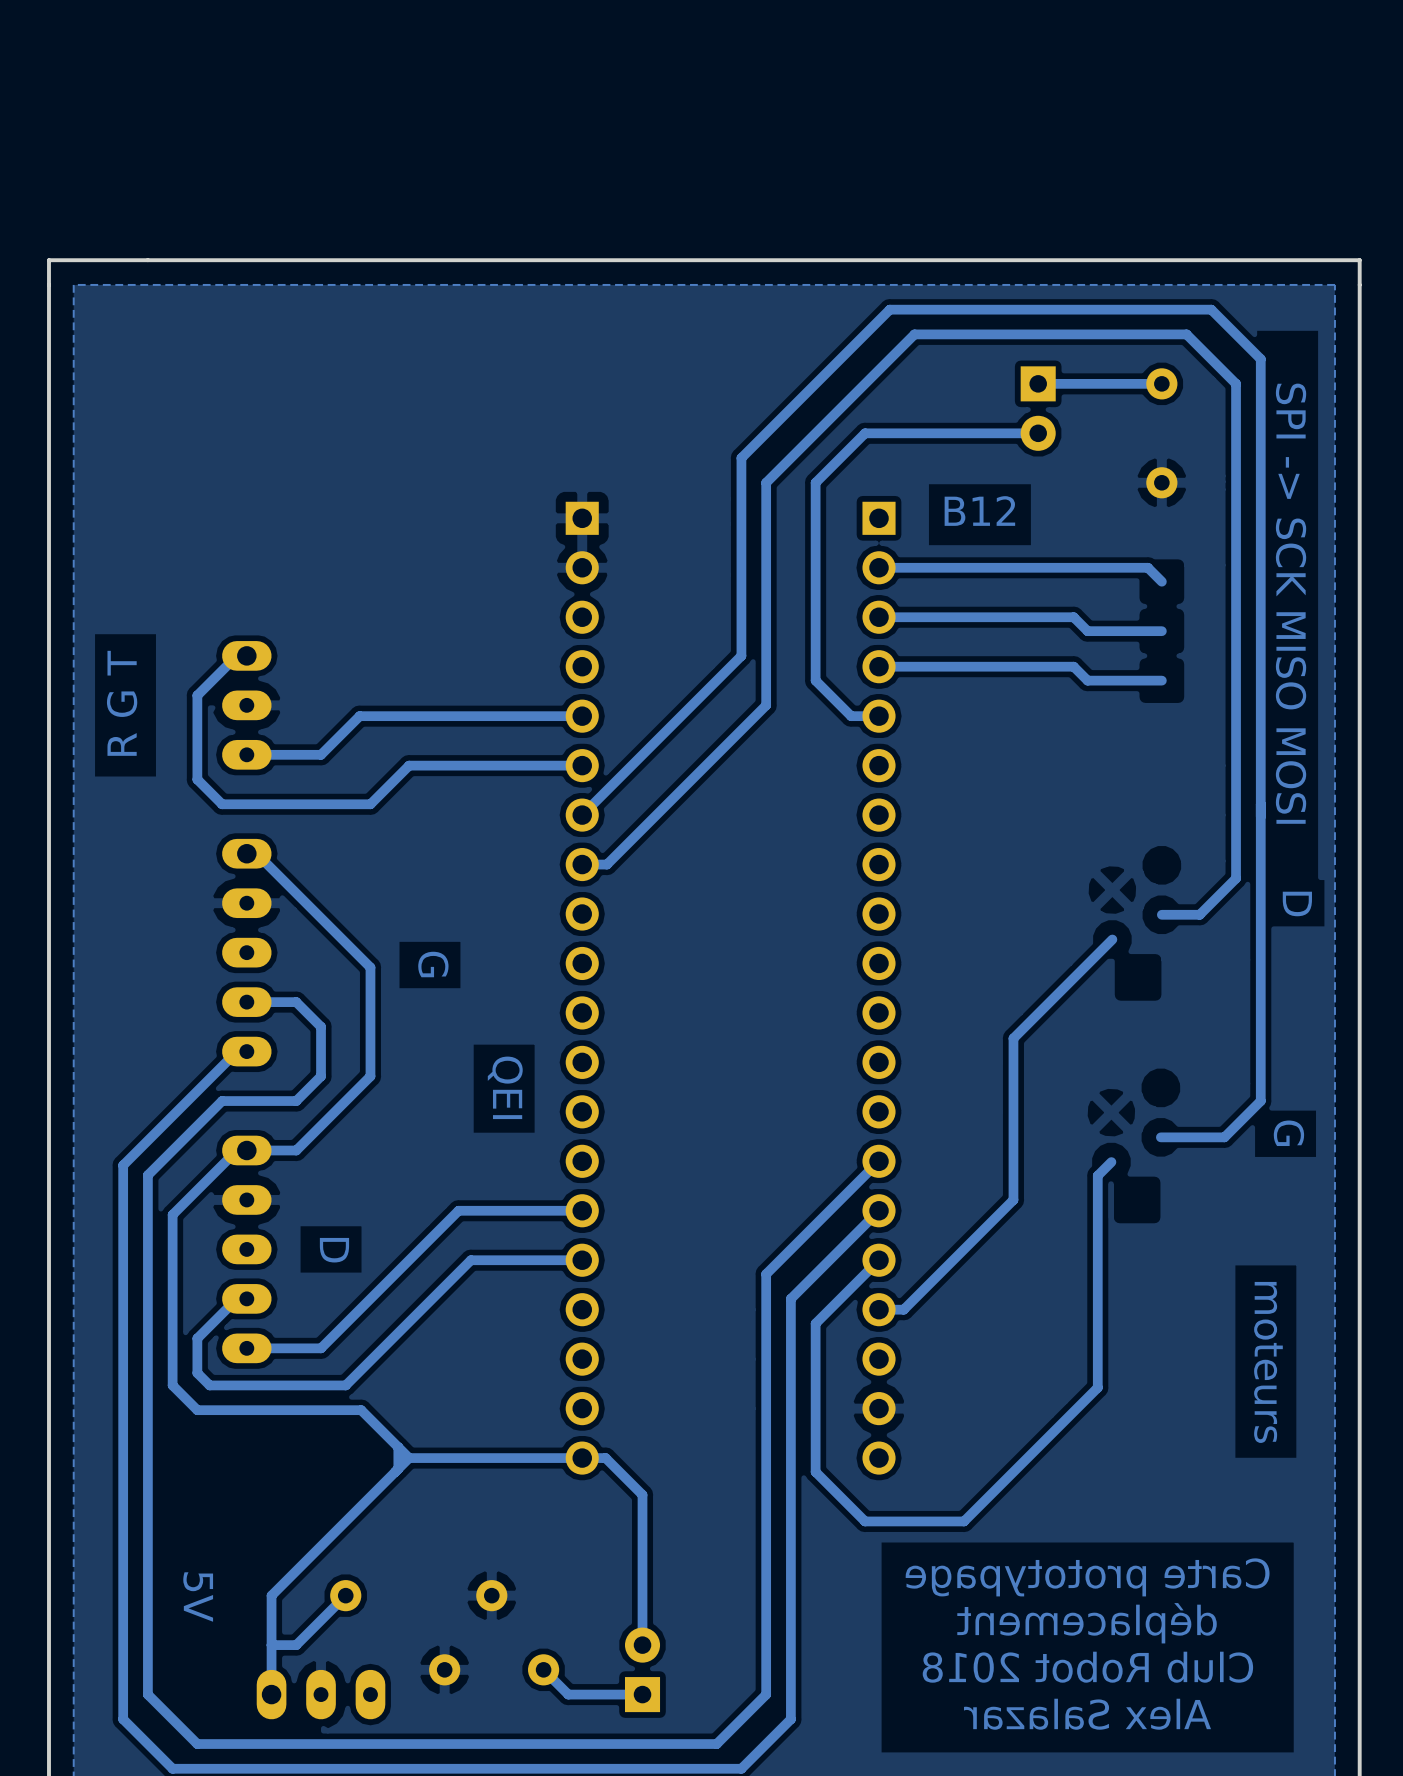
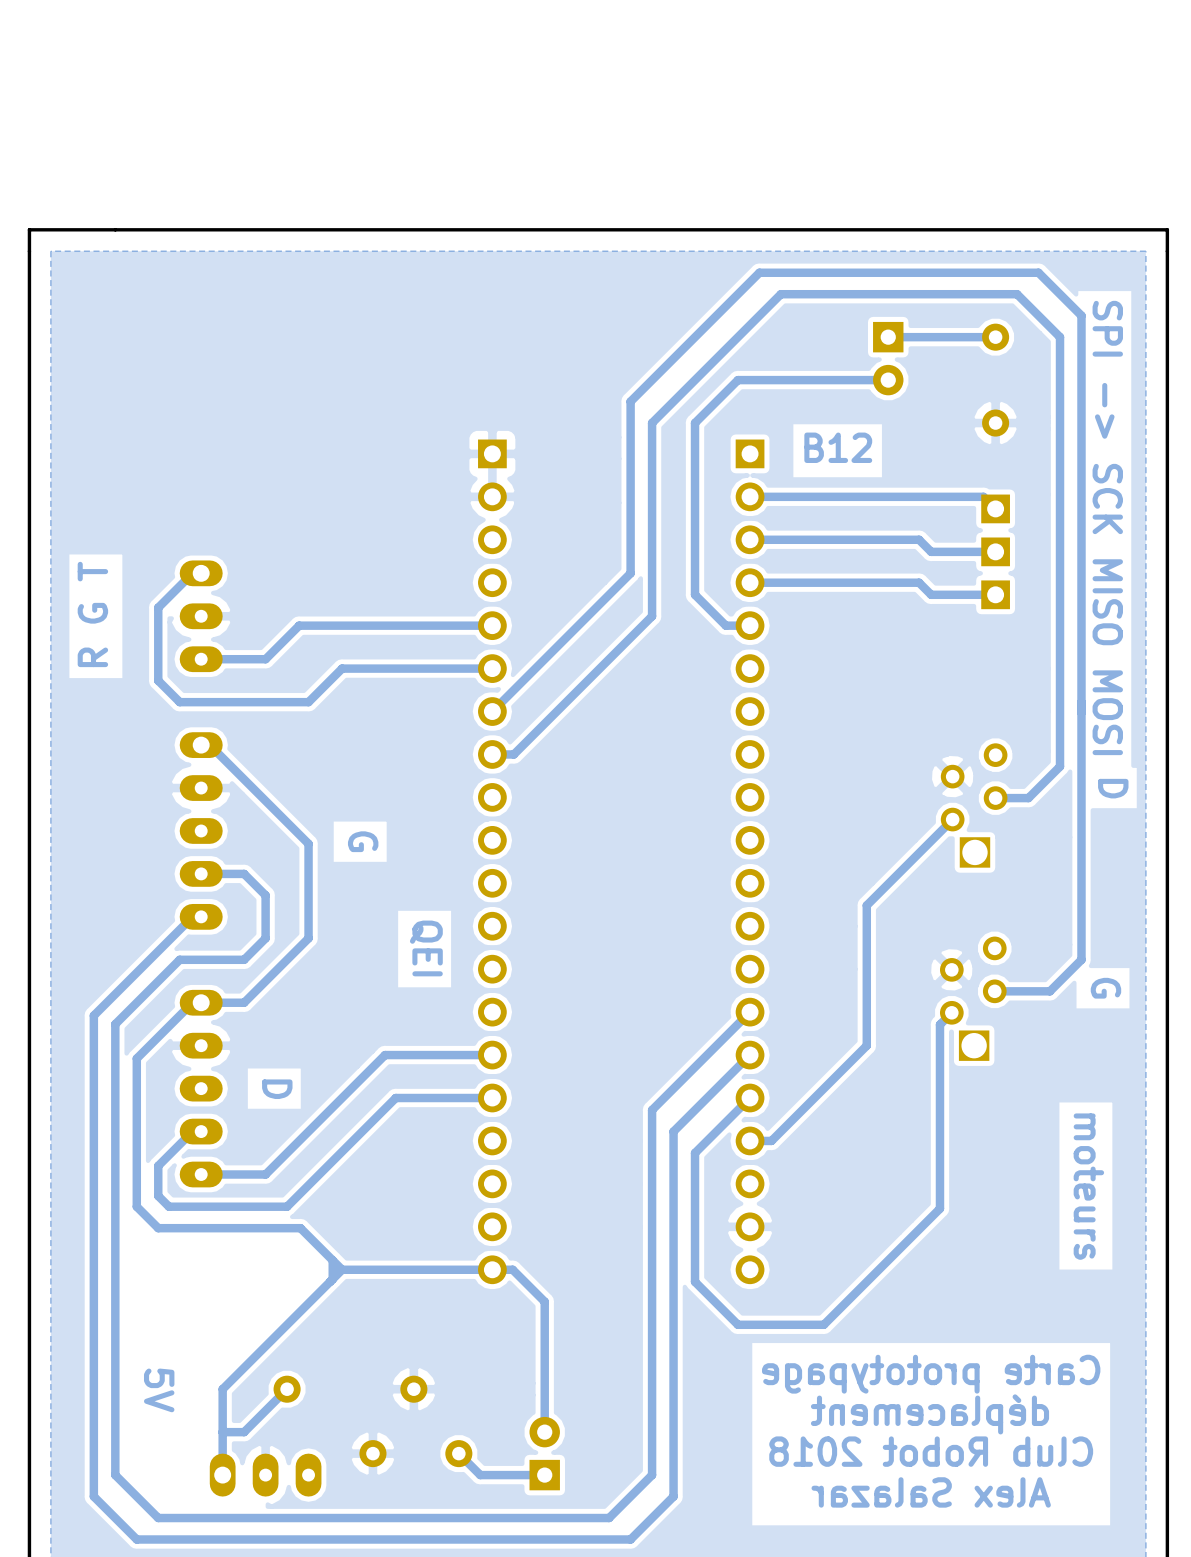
part: none -> (995, 508)
part: none -> (995, 551)
part: none -> (995, 594)
part: none -> (974, 805)
part: none -> (973, 998)

